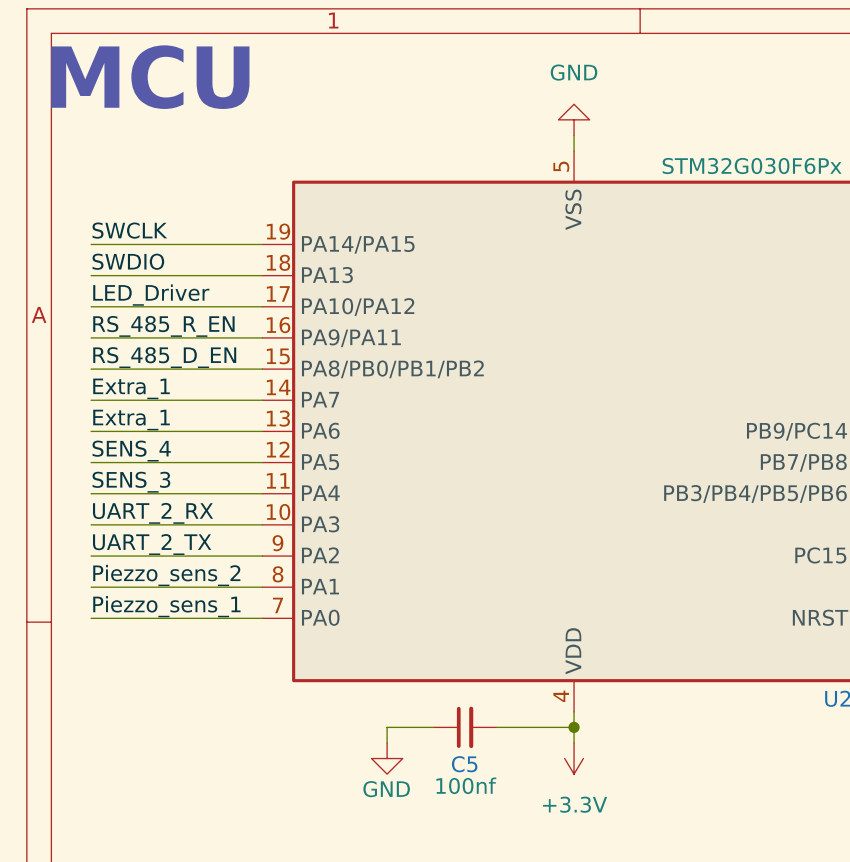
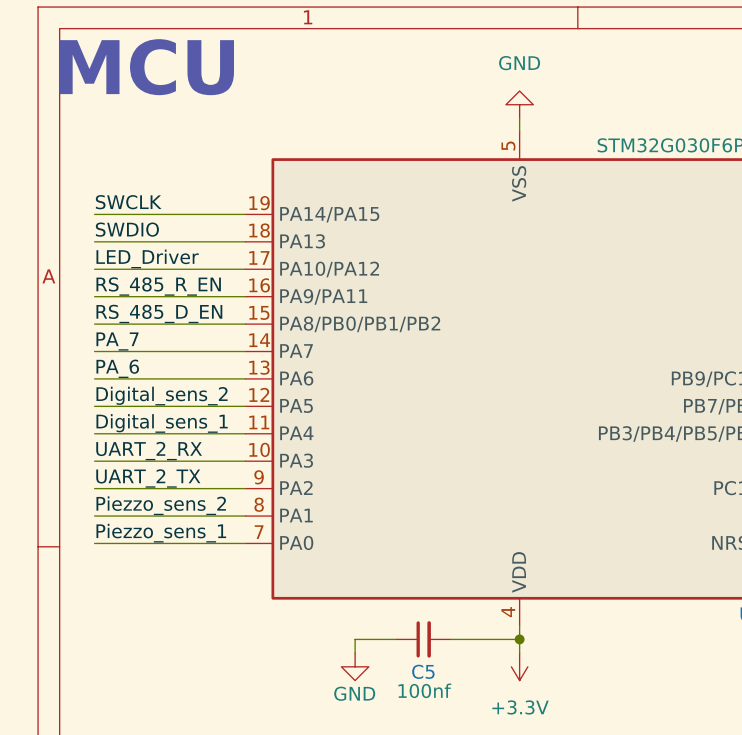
label: Extra_1 (131, 388) -> PA_7 (117, 341)
label: Extra_1 (131, 420) -> PA_6 (117, 368)
label: SENS_4 (131, 451) -> Digital_sens_2 (162, 396)
label: SENS_3 (131, 482) -> Digital_sens_1 (162, 423)

